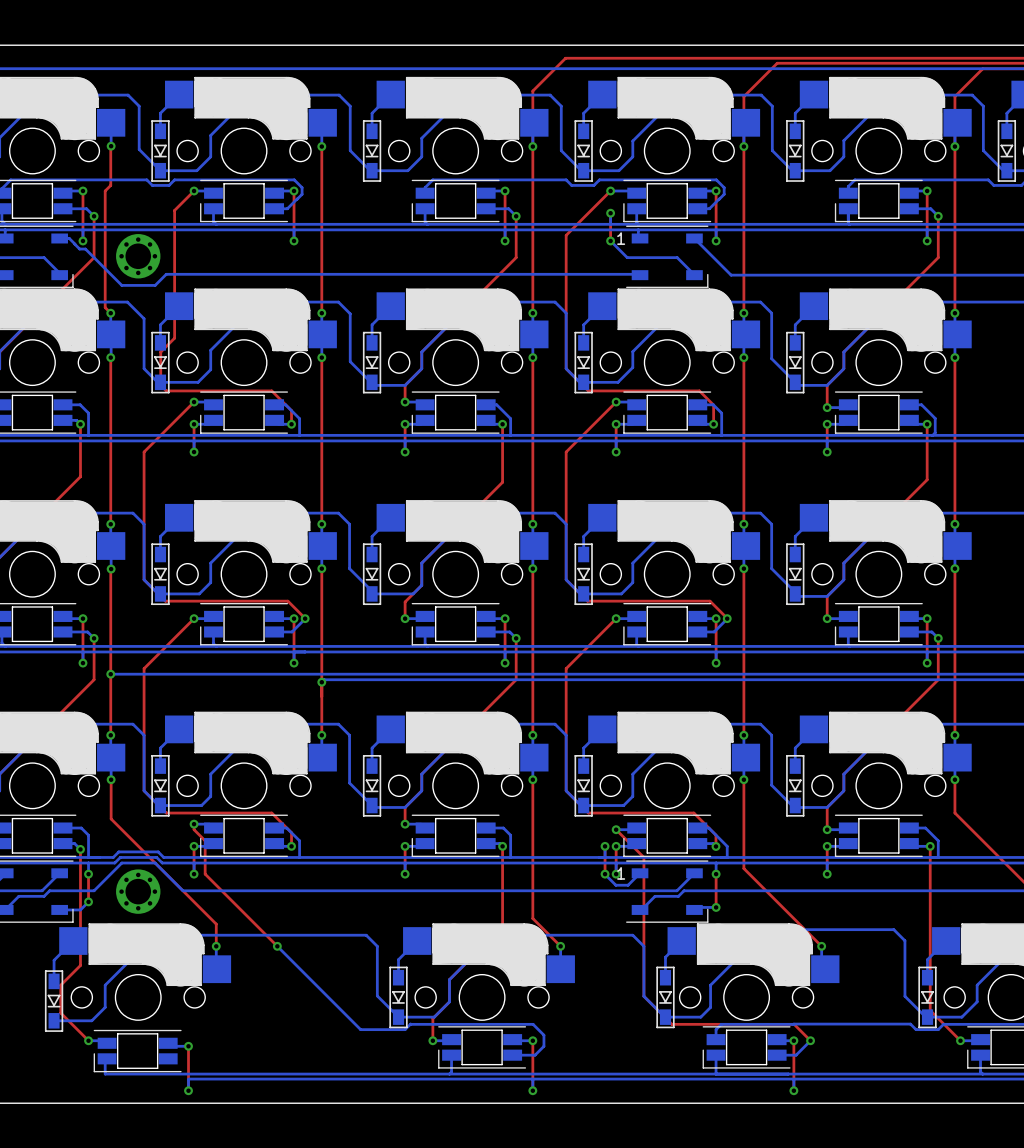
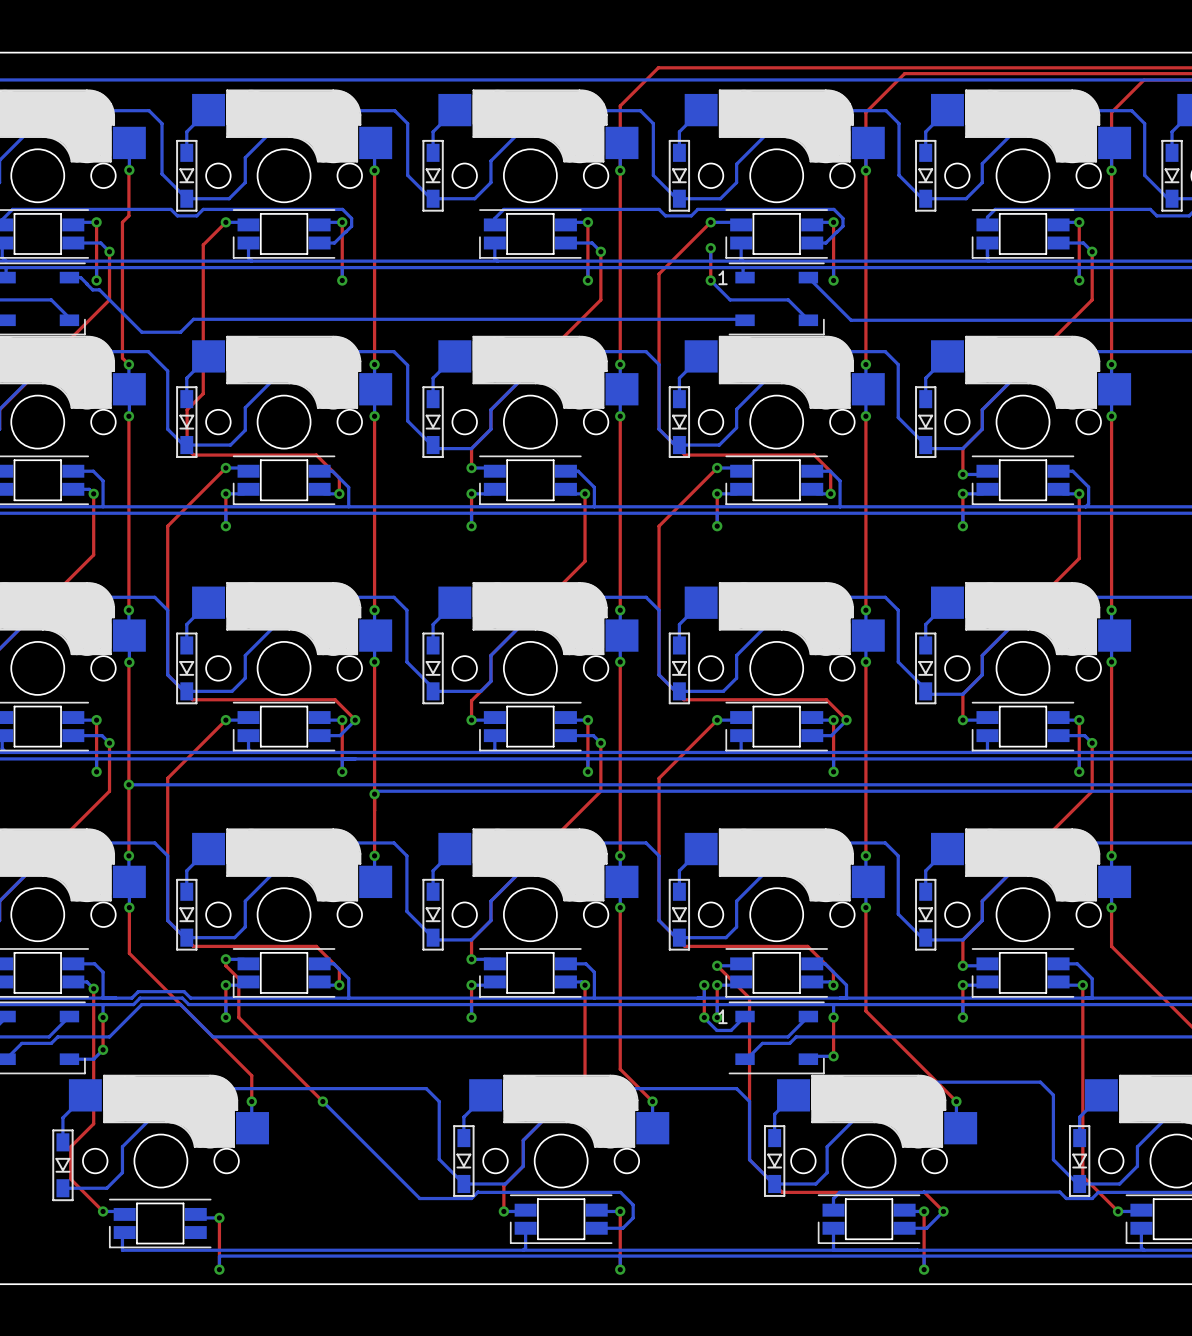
part: (138, 256) -> none
part: (138, 891) -> none

